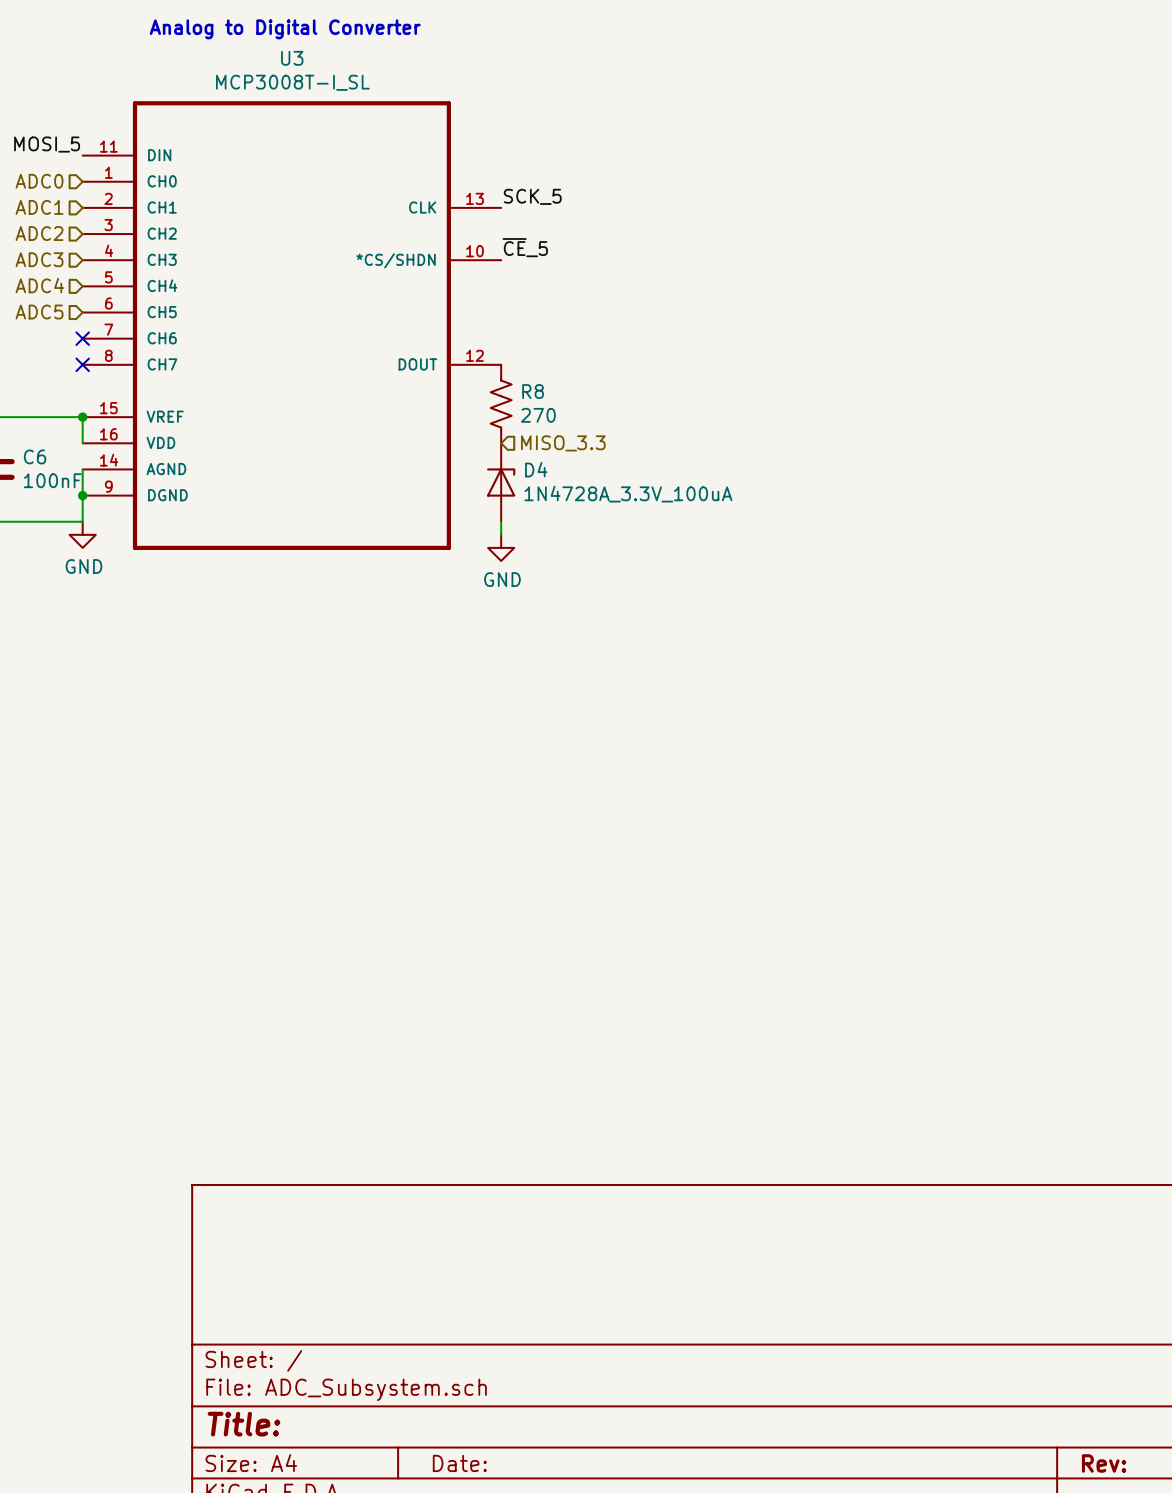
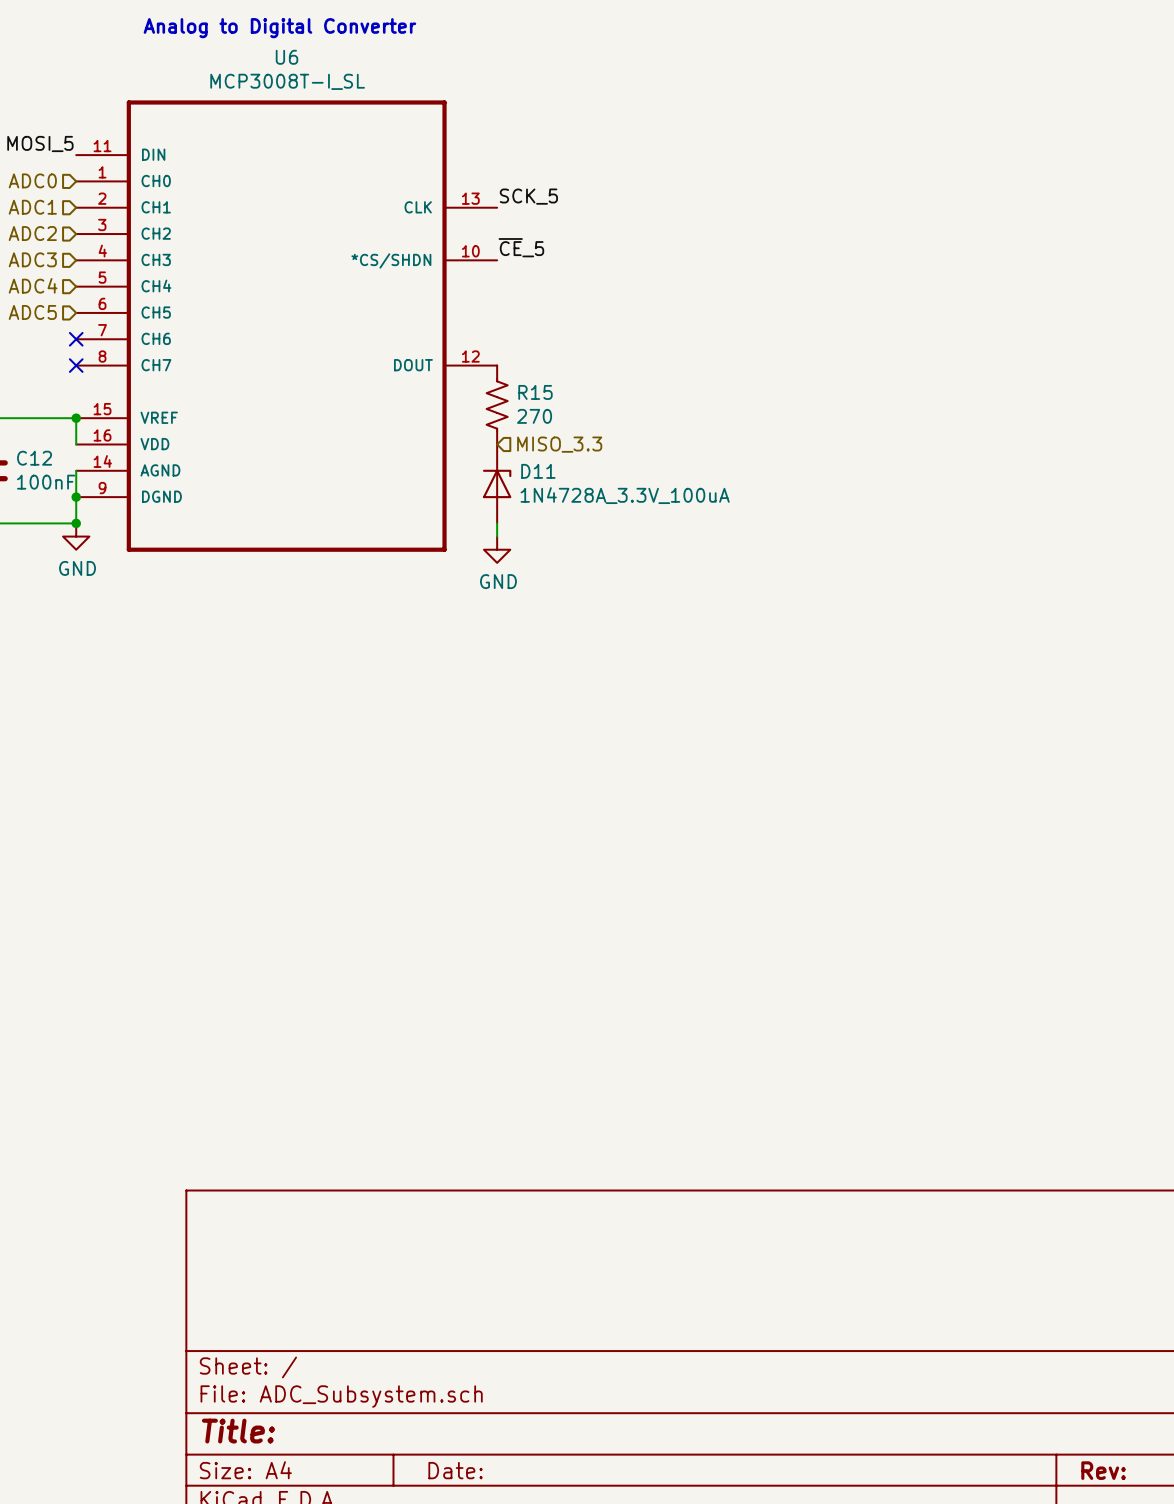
U3 name: U3 (292, 58) -> U6 (286, 57)
R8 name: R8 (533, 391) -> R15 (535, 392)
C6 name: C6 (35, 456) -> C12 (34, 458)
D4 name: D4 (536, 469) -> D11 (538, 471)
junction: none -> (76, 523)

